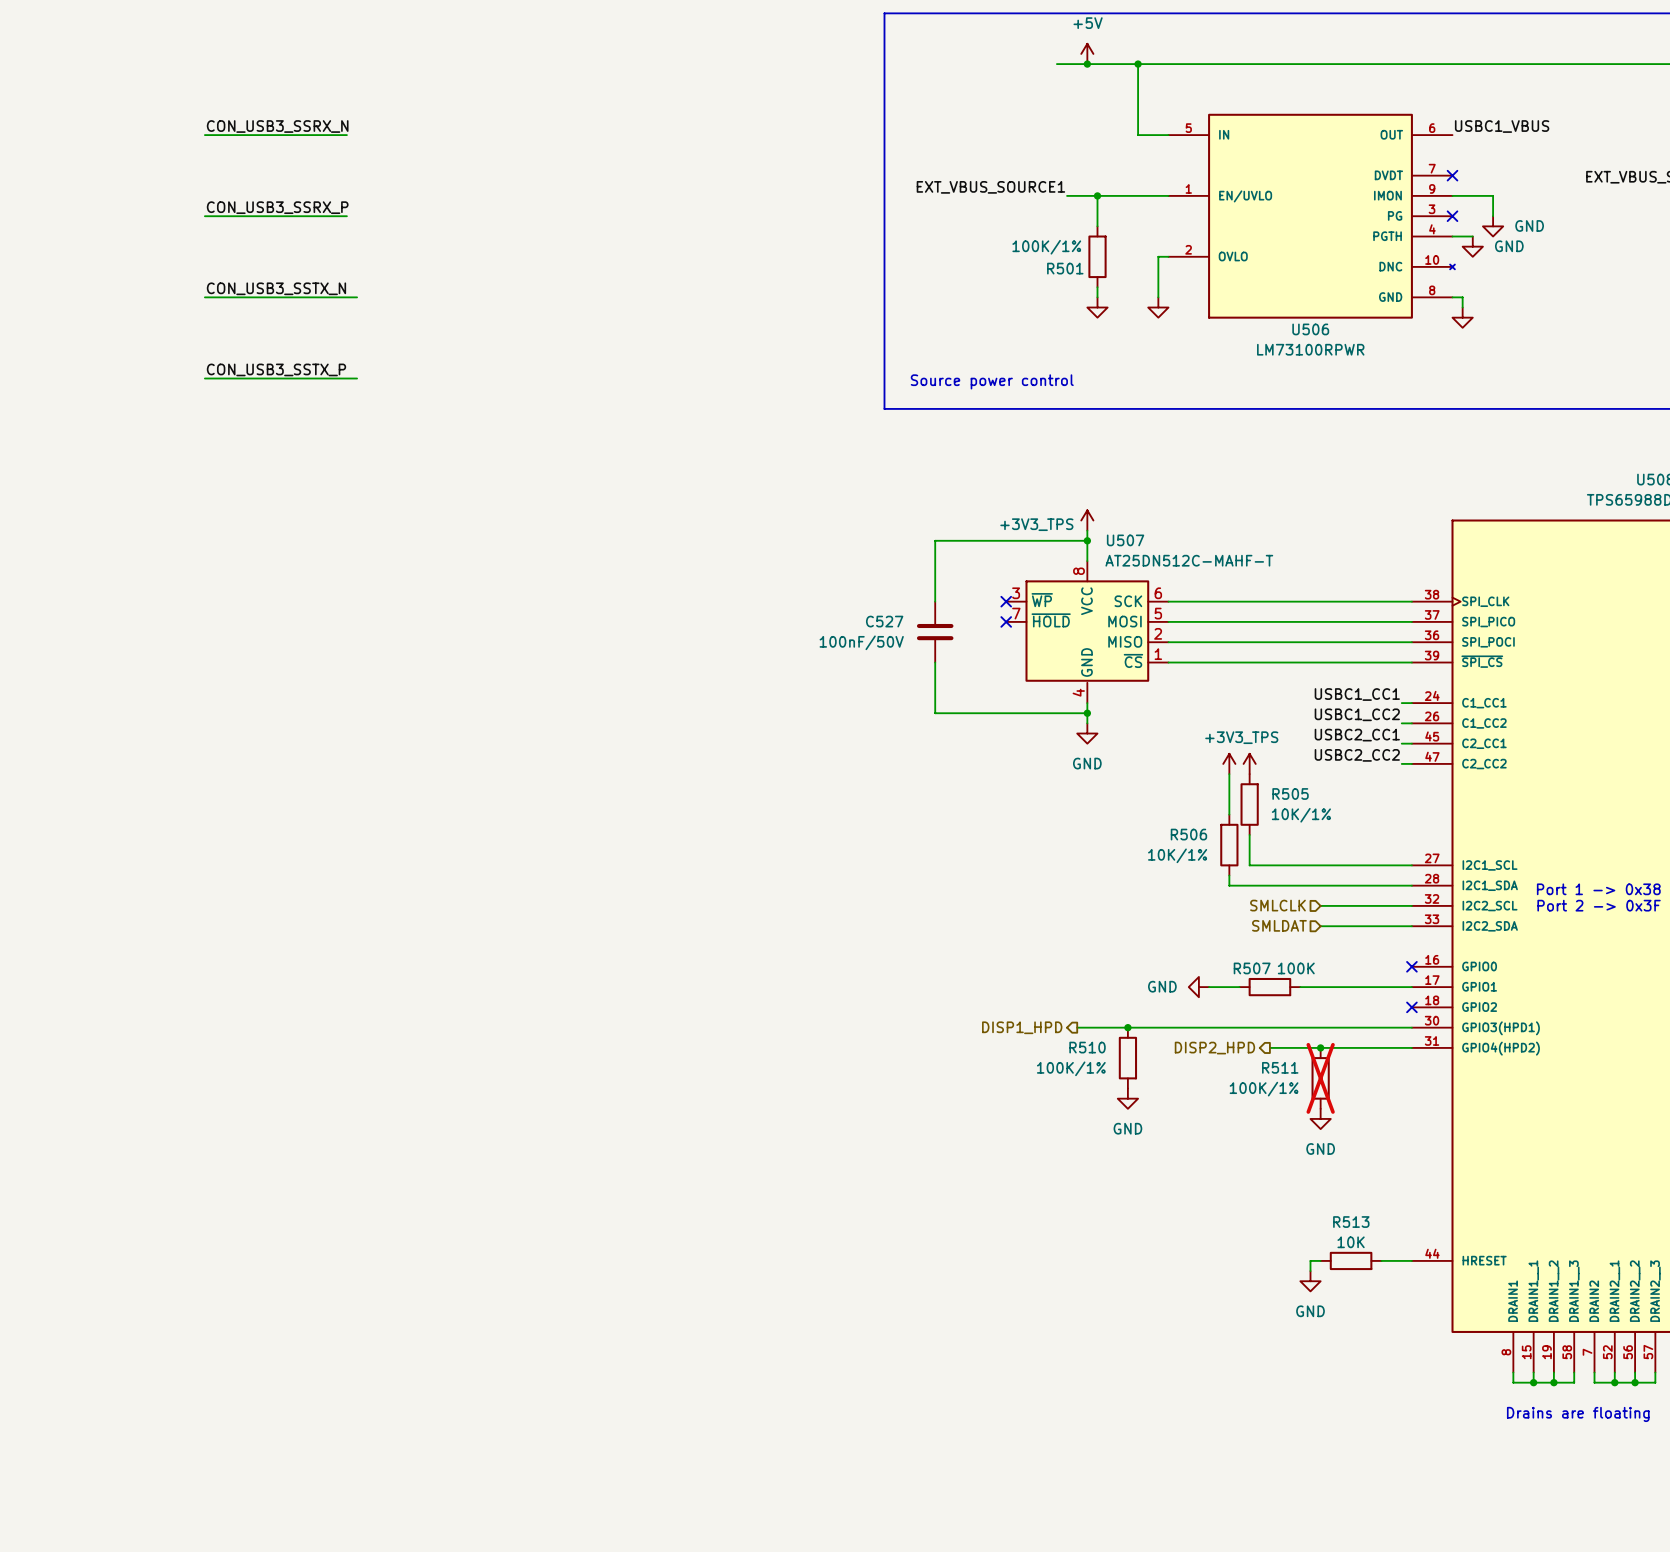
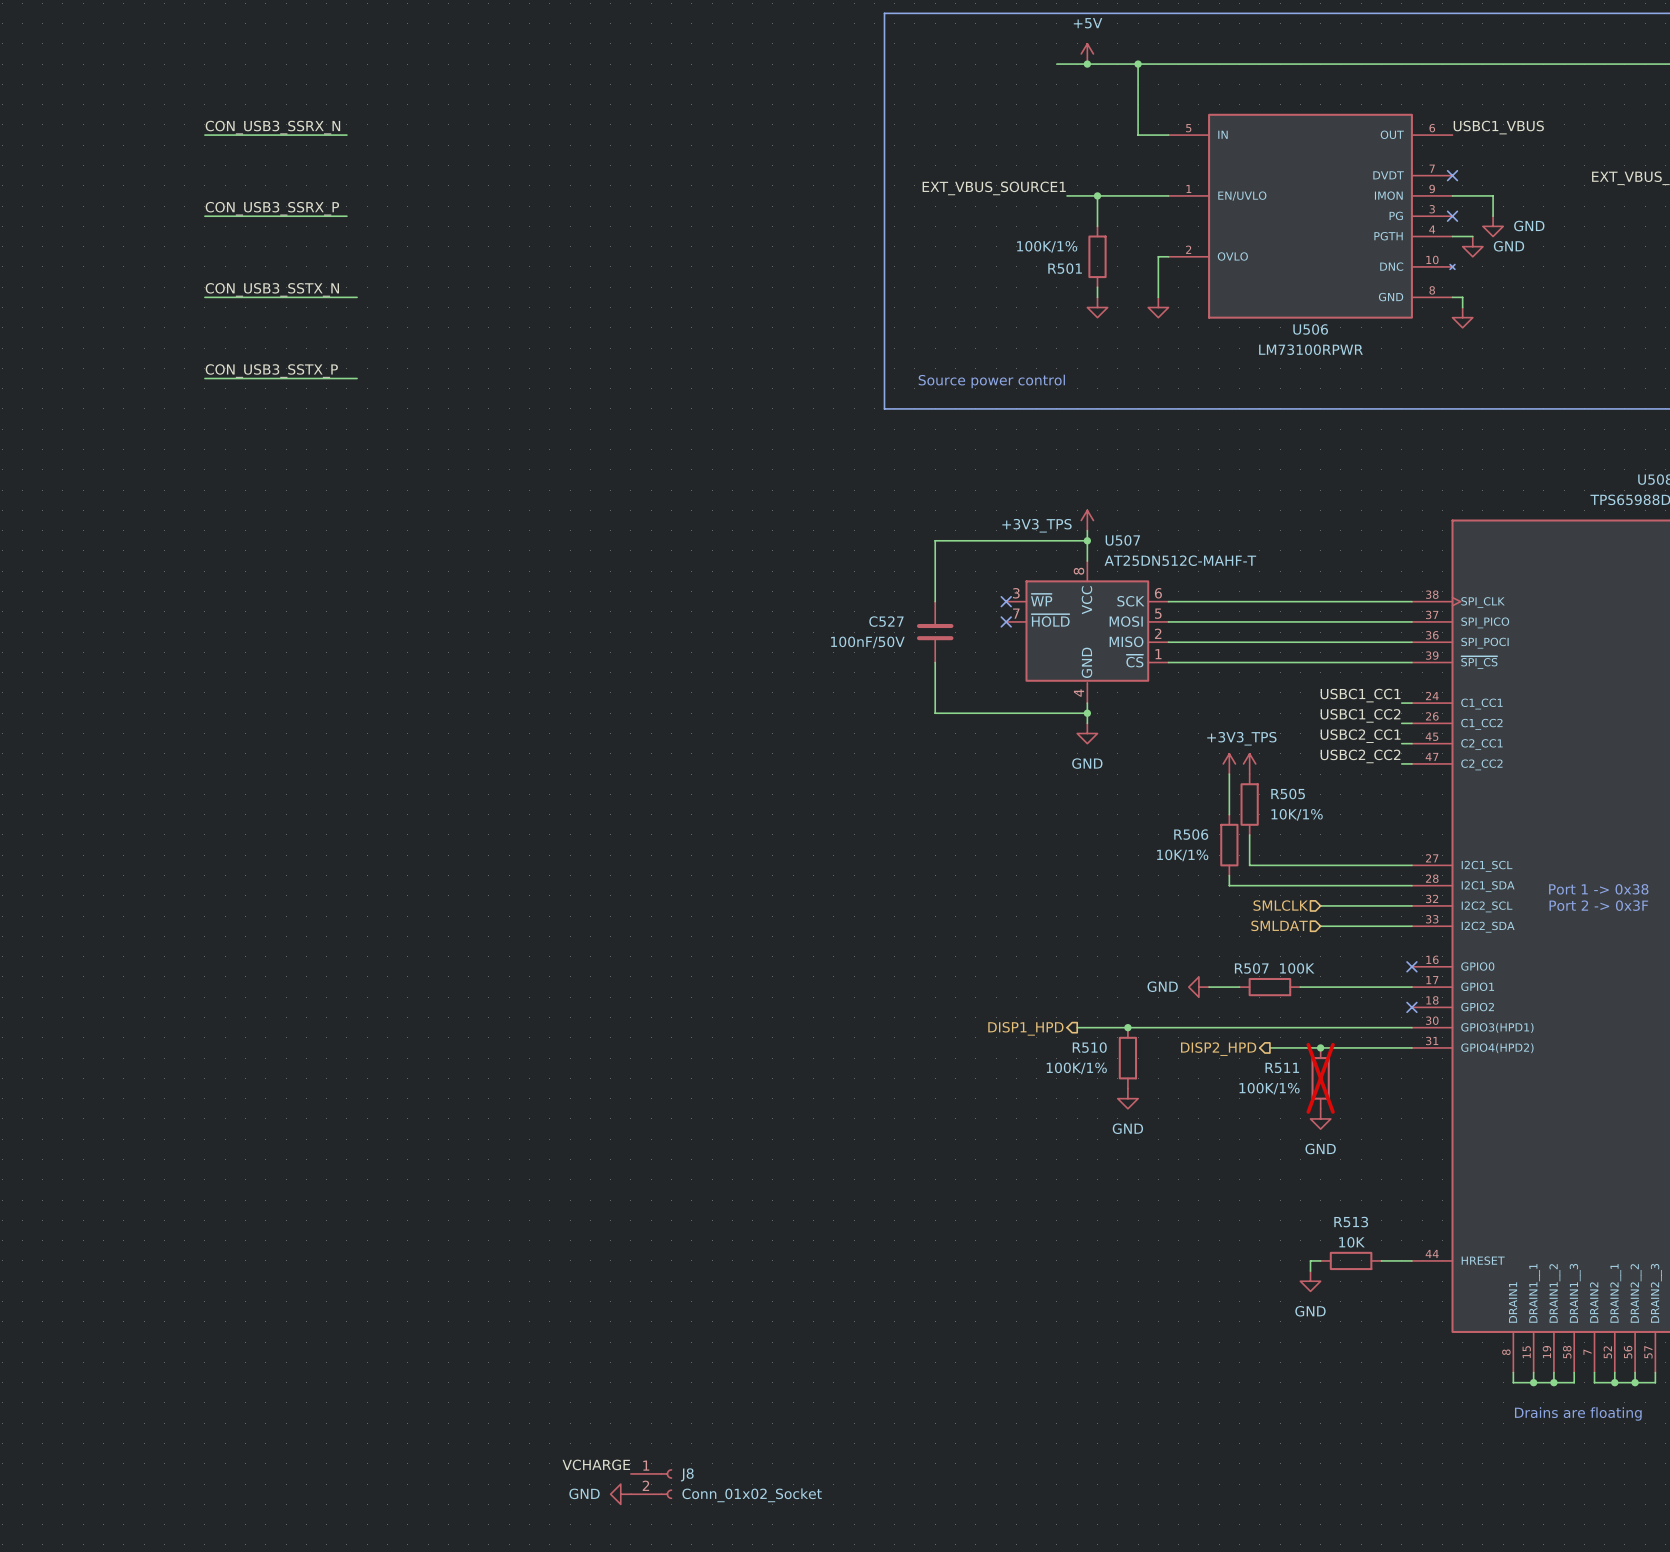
label: none -> VCHARGE (596, 1464)
J8: none -> Conn_01x02_Socket (651, 1484)
power symbol: none -> GND (620, 1494)

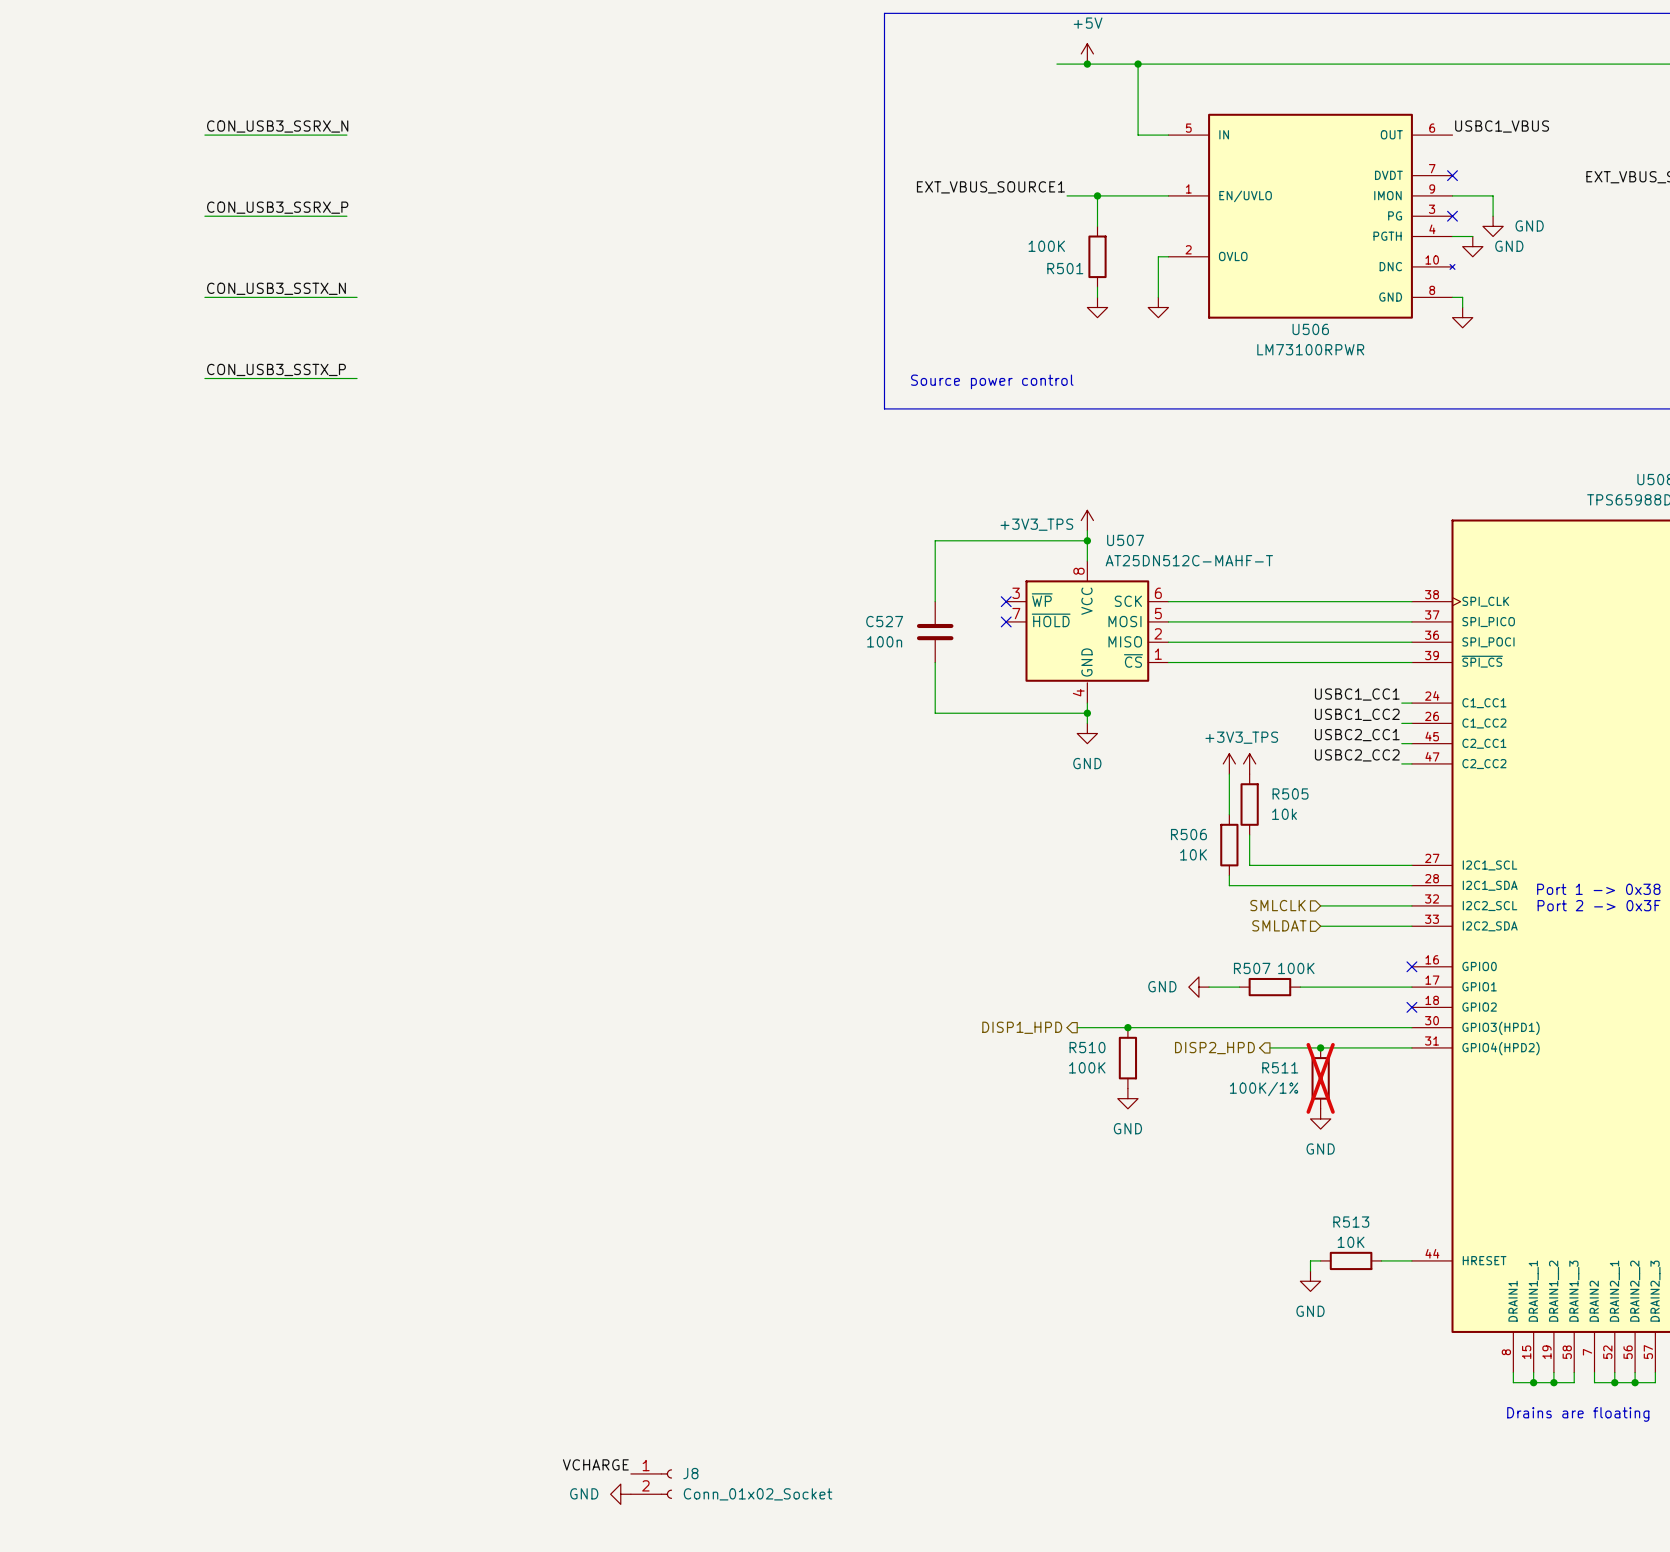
R501 value: 100K/1% (1047, 246) -> 100K (1046, 246)
C527 value: 100nF/50V (867, 642) -> 100n (884, 641)
R505 value: 10K/1% (1297, 814) -> 10k (1284, 814)
R506 value: 10K/1% (1182, 855) -> 10K (1193, 854)
R510 value: 100K/1% (1076, 1068) -> 100K (1087, 1067)

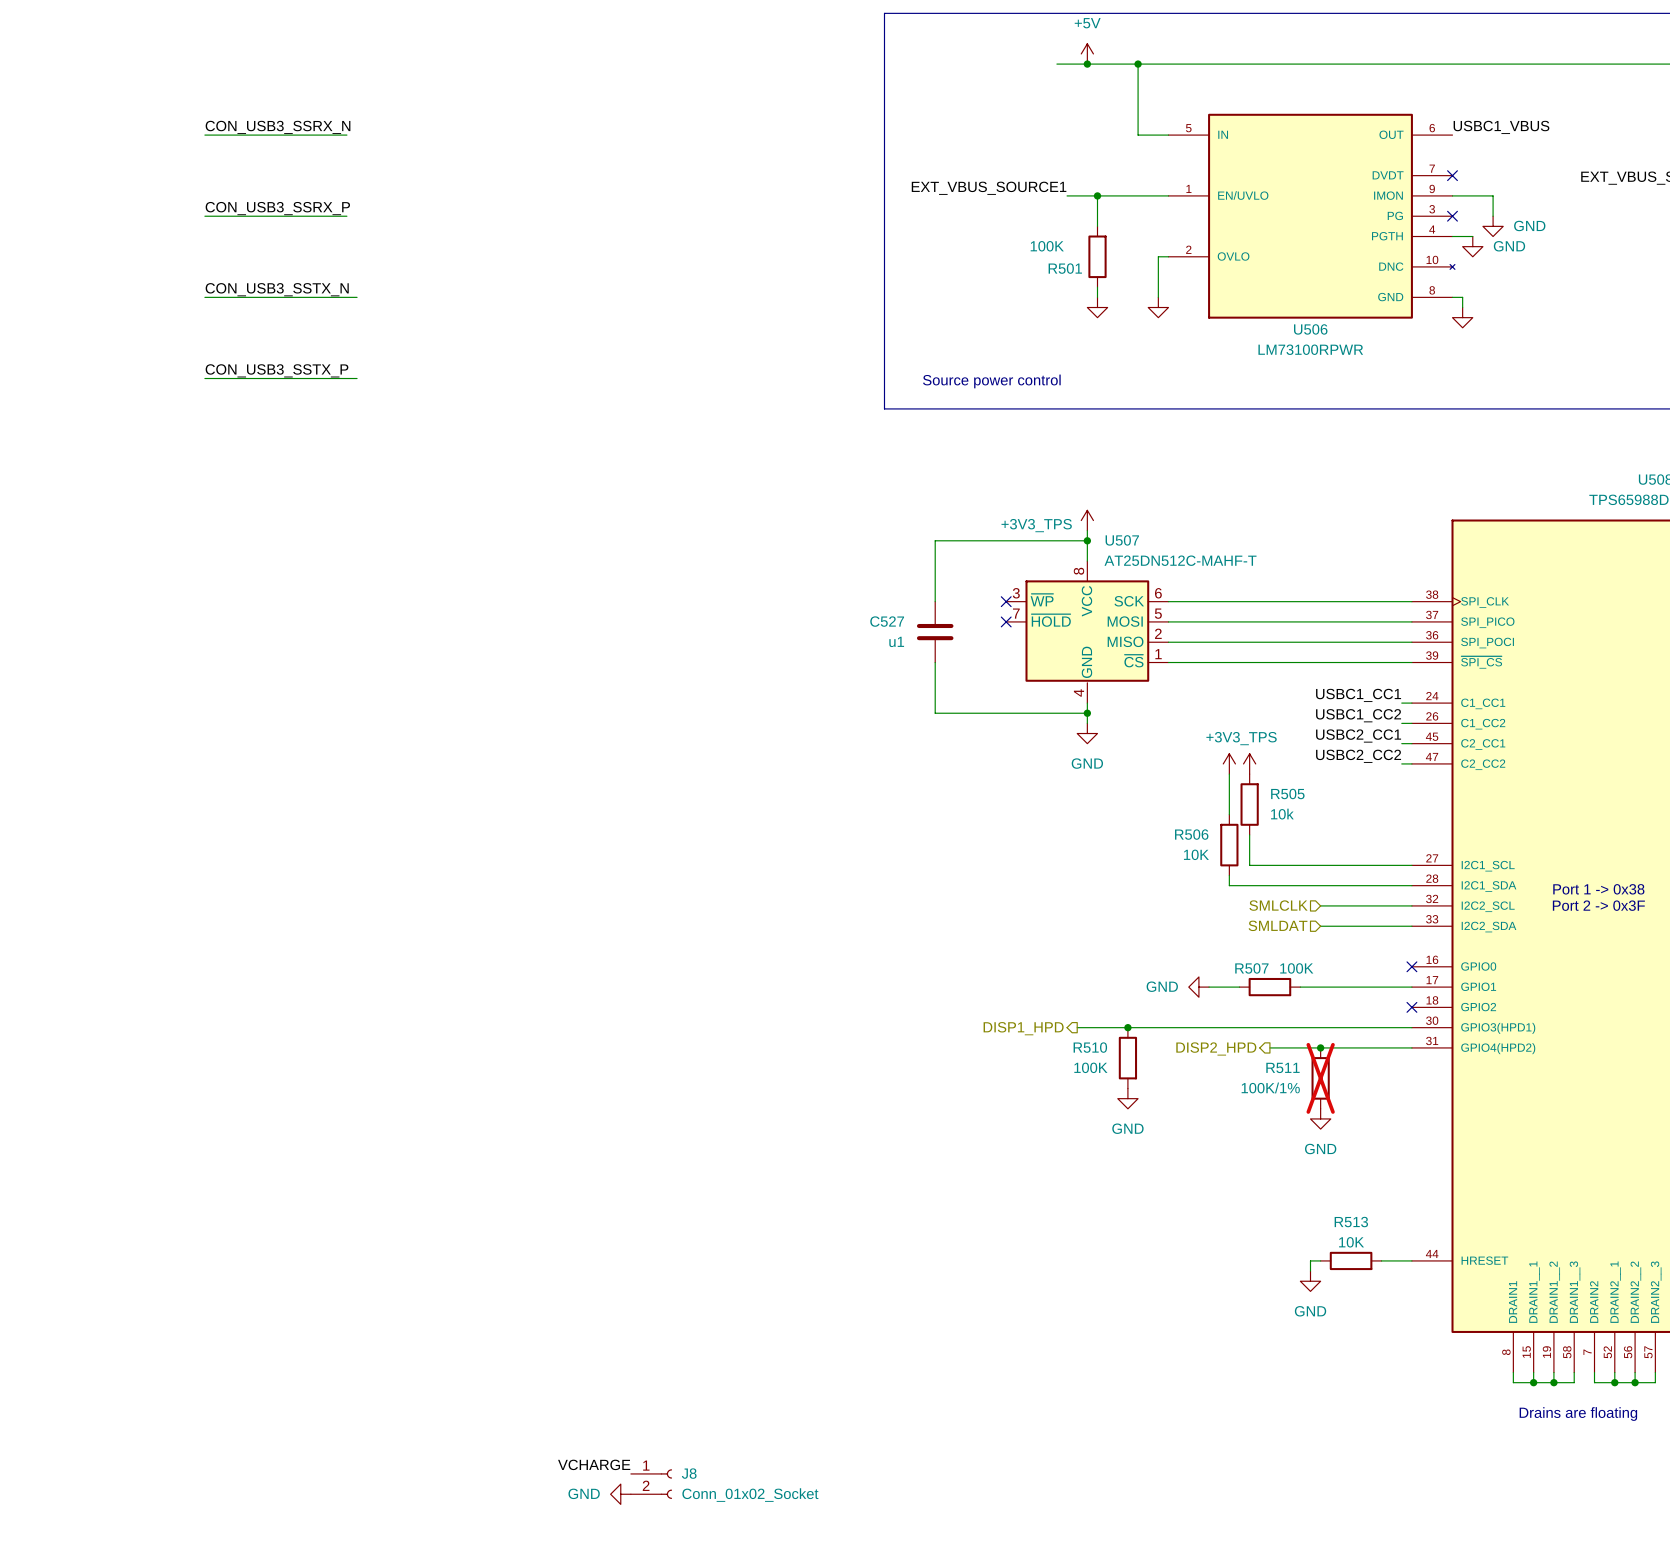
C527 value: 100n (884, 641) -> u1 (896, 641)

